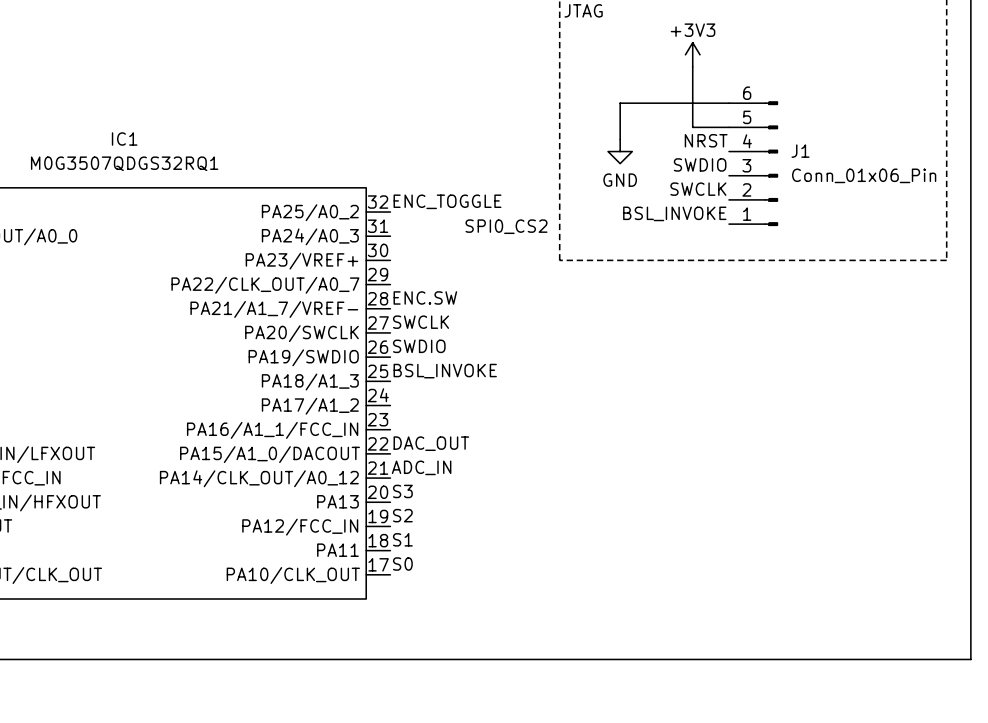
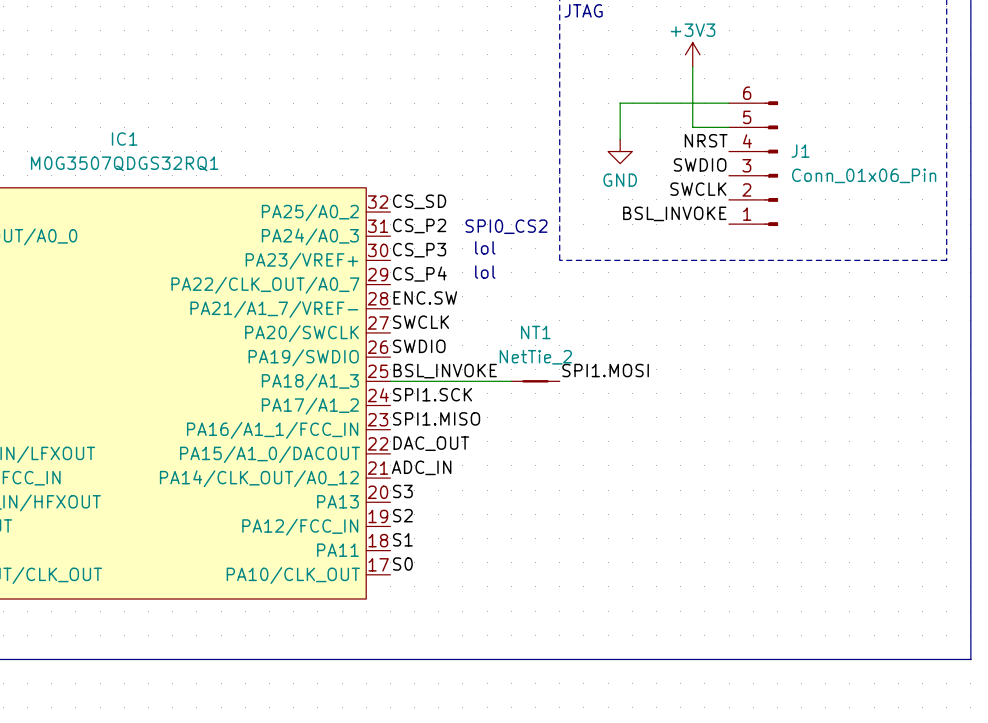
label: ENC_TOGGLE (447, 201) -> CS_SD (419, 201)
label: none -> CS_P2 (419, 225)
text: none -> lol (485, 247)
label: none -> CS_P3 (419, 250)
text: none -> lol (485, 272)
label: none -> CS_P4 (419, 274)
label: none -> SPI1.MOSI (605, 370)
wire: none -> (390, 381) (511, 381)
NT1: none -> NetTie_2 (535, 381)
label: none -> SPI1.SCK (432, 394)
label: none -> SPI1.MISO (436, 418)

